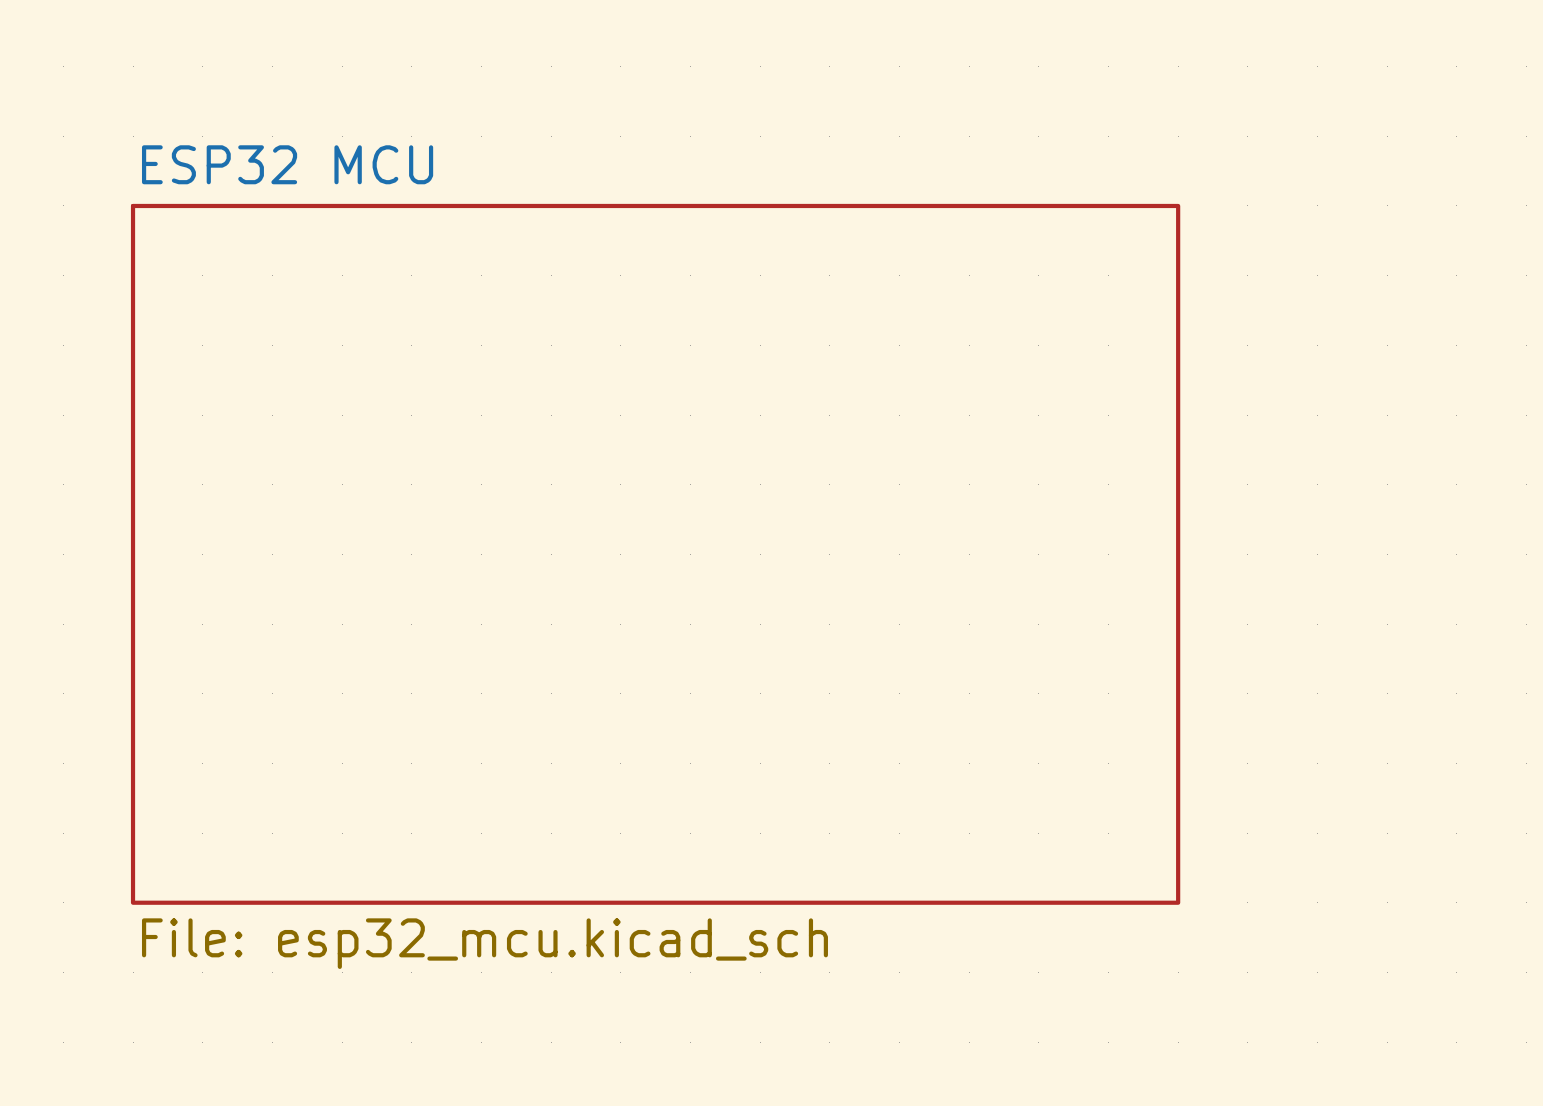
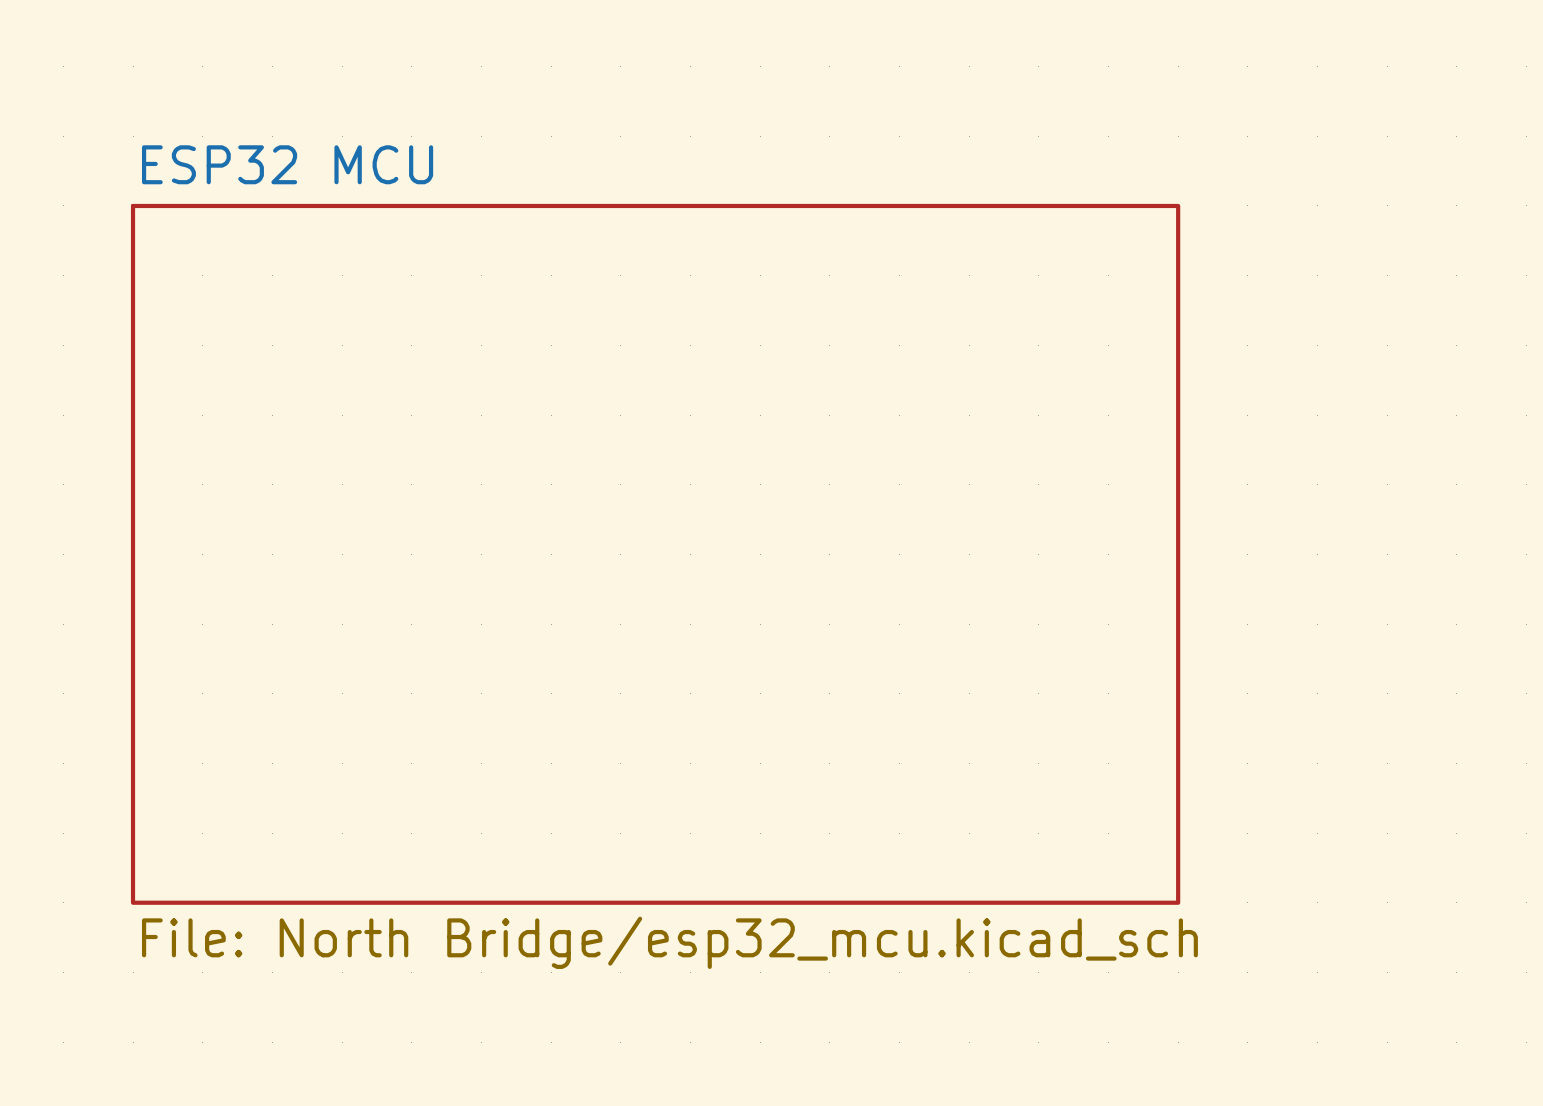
sheet ESP32 MCU value: File: esp32_mcu.kicad_sch (484, 943) -> File: North Bridge/esp32_mcu.kicad_sch (669, 942)

